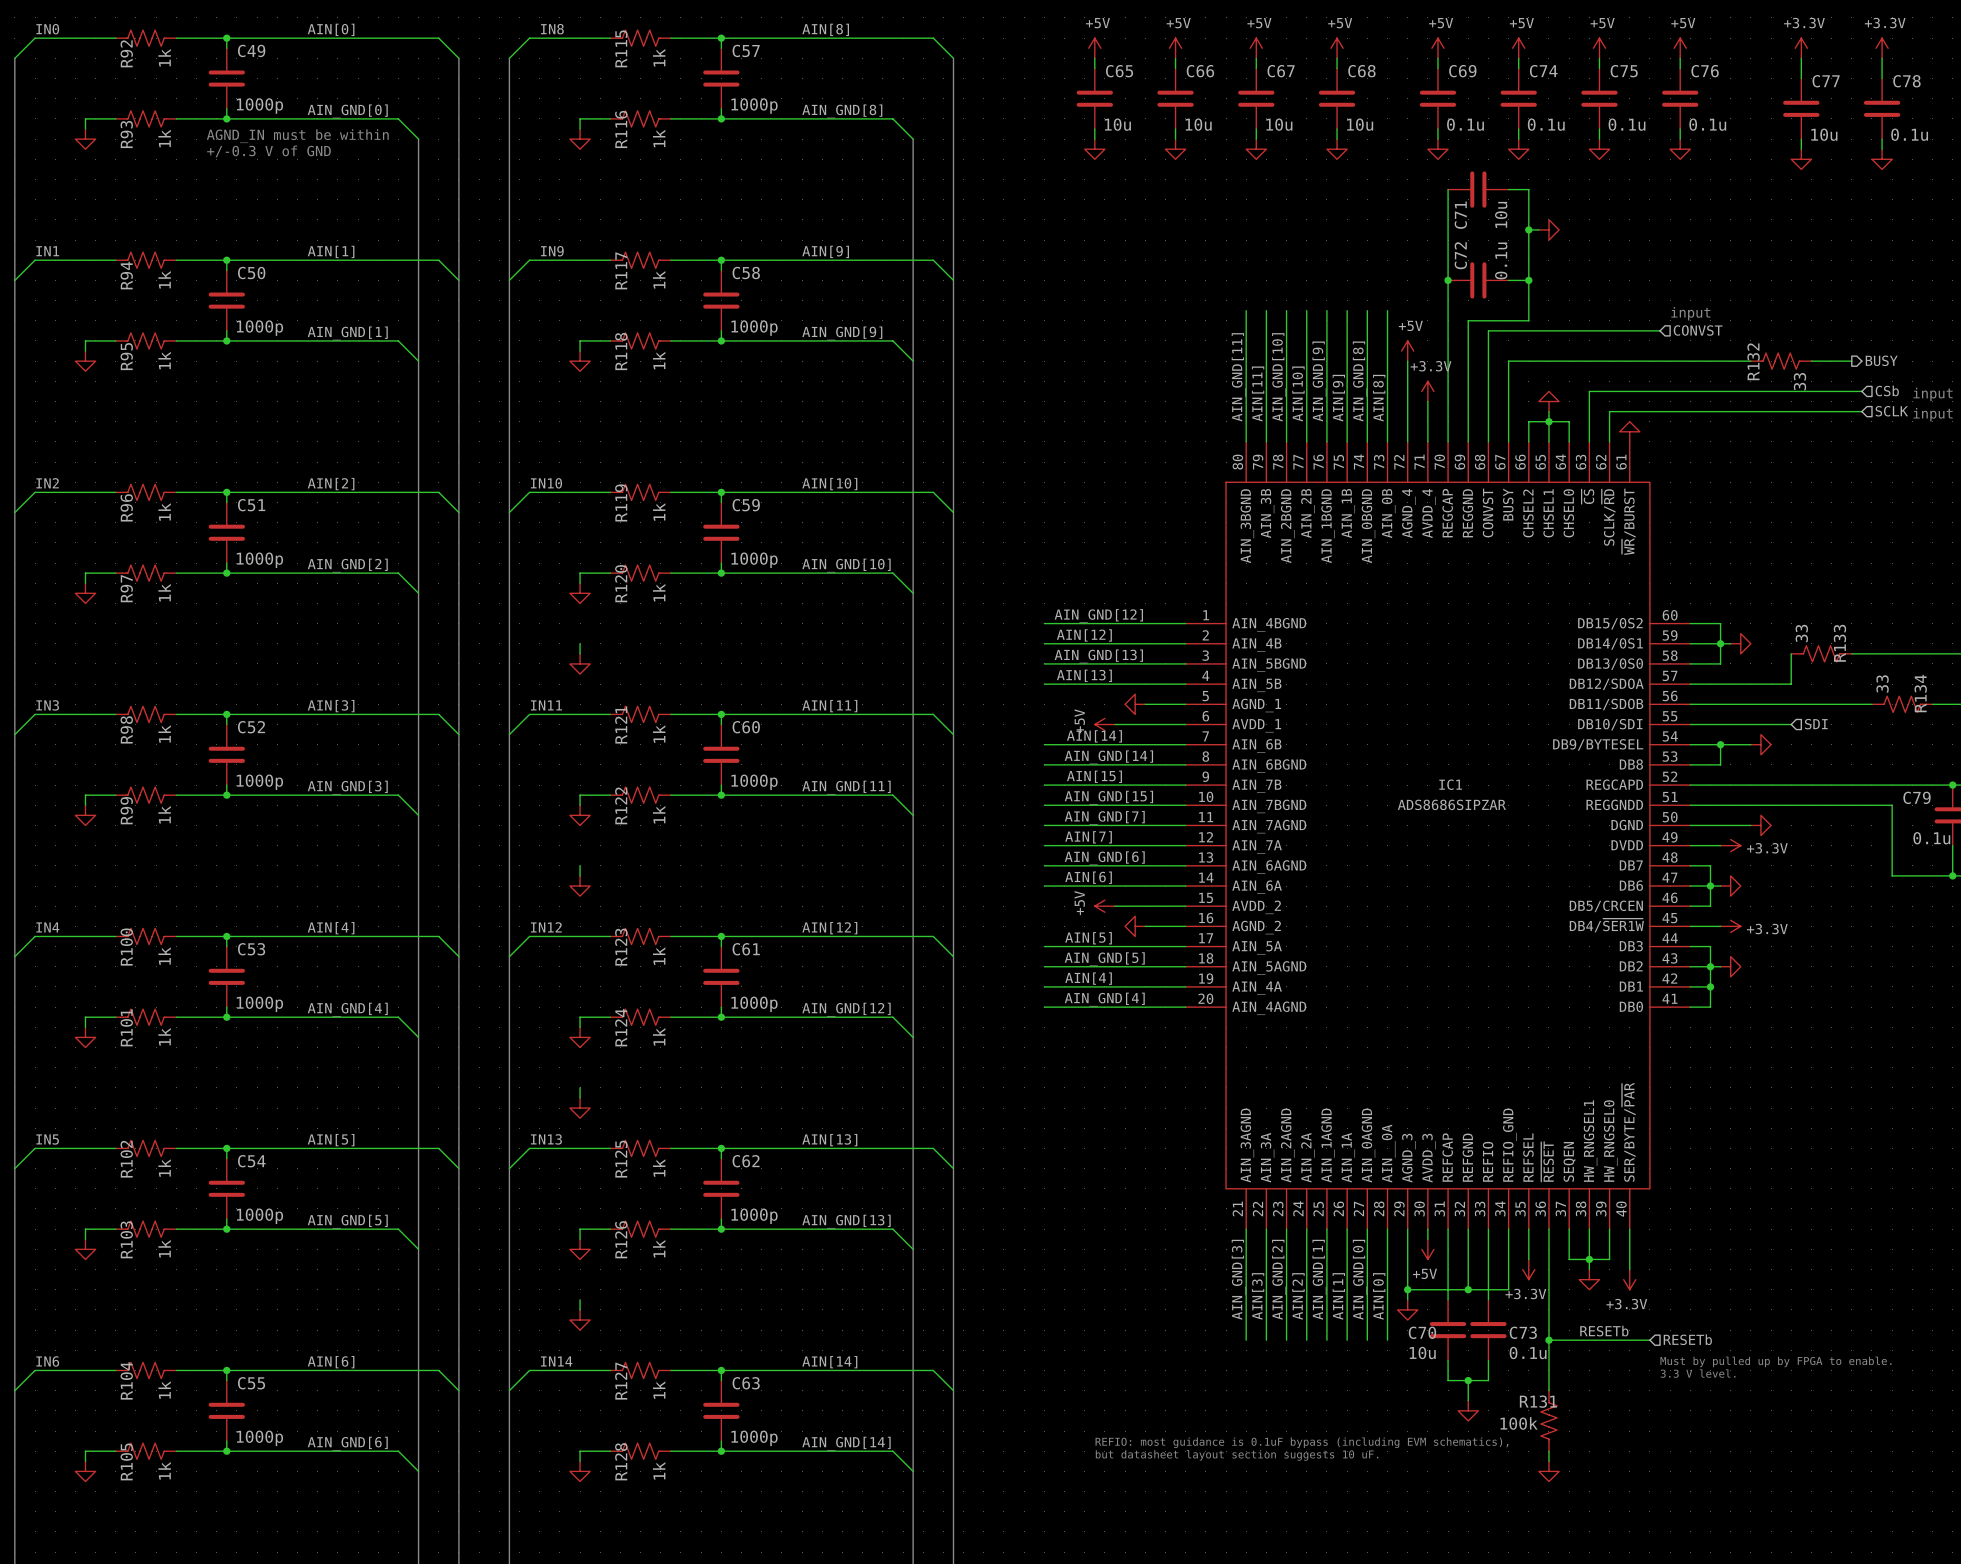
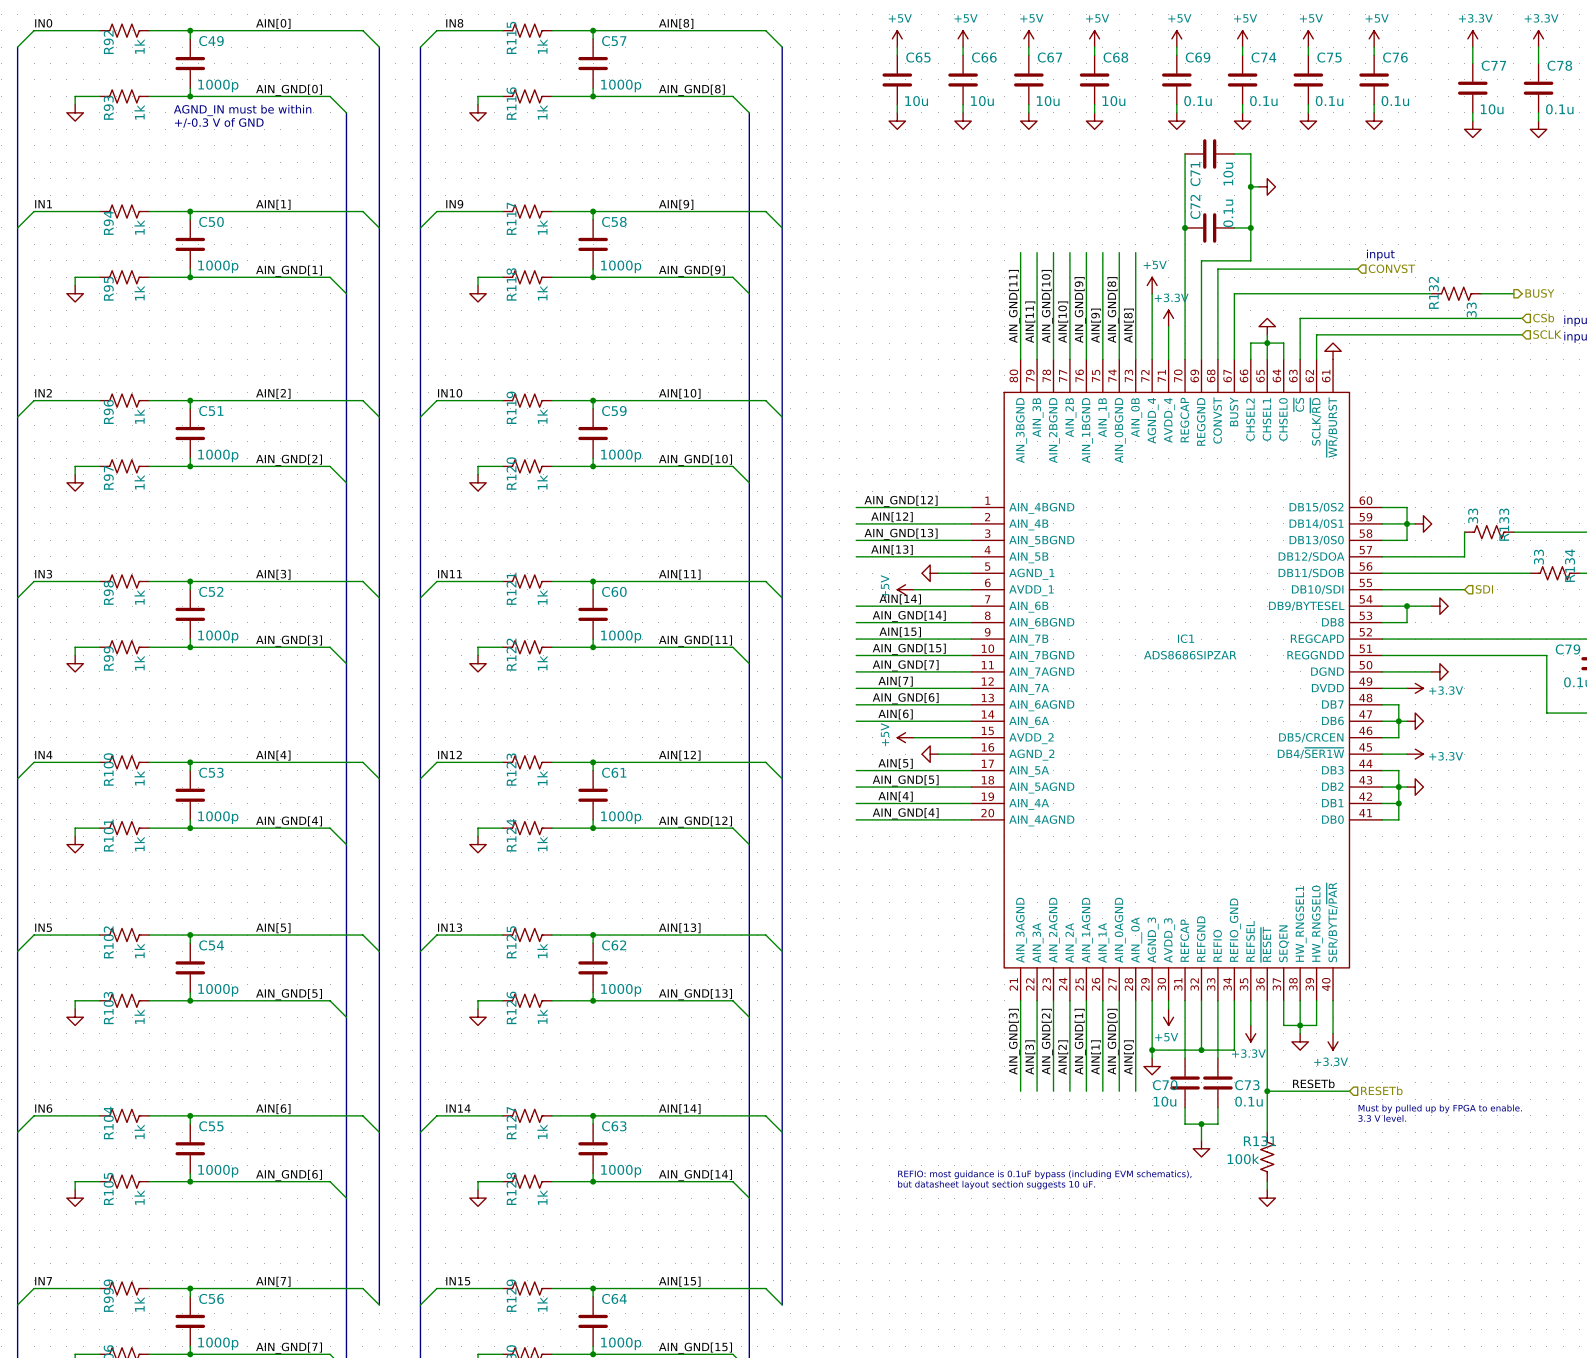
wire: (580, 643) (580, 653) -> none
power symbol: (580, 663) -> none
wire: (580, 865) (580, 875) -> none
power symbol: (580, 886) -> none
wire: (580, 1087) (580, 1097) -> none
power symbol: (580, 1108) -> none
wire: (580, 1299) (580, 1309) -> none
power symbol: (580, 1320) -> none

